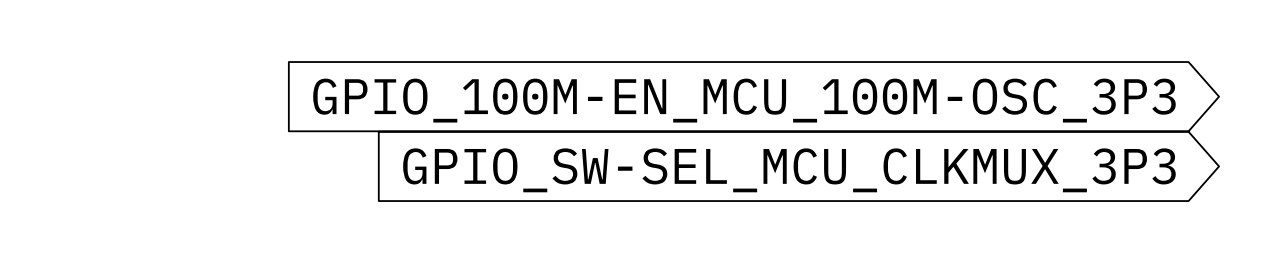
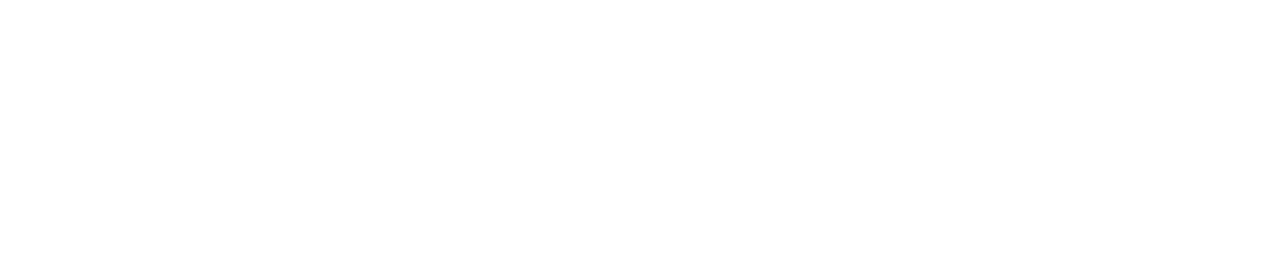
global label: GPIO_100M-EN_MCU_100M-OSC_3P3 (744, 100) -> none
global label: GPIO_SW-SEL_MCU_CLKMUX_3P3 (789, 170) -> none

